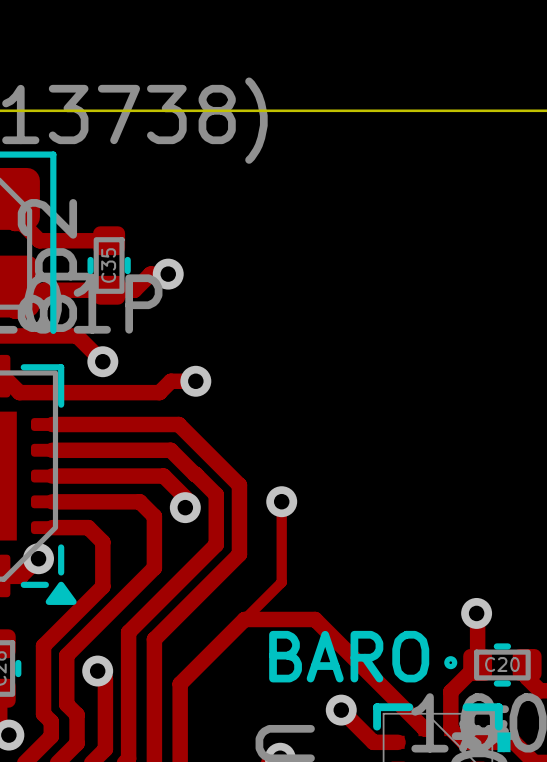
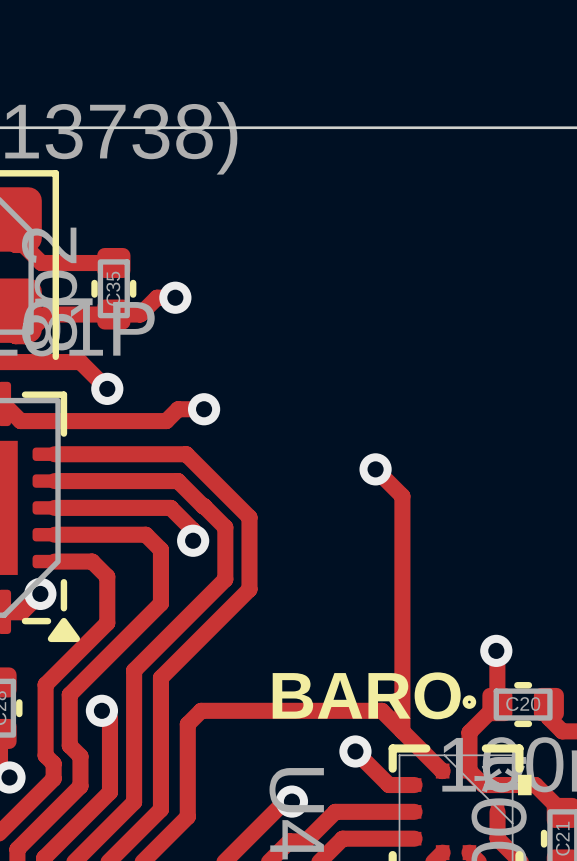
track: none -> (375, 469) (402, 496) (402, 731)
track: (281, 501) (281, 582) (244, 619) -> none
via position: (281, 501) -> (375, 469)
track: (244, 619) (315, 619) (366, 671) -> (201, 710) (381, 710)
track: (244, 619) (193, 671) -> none

